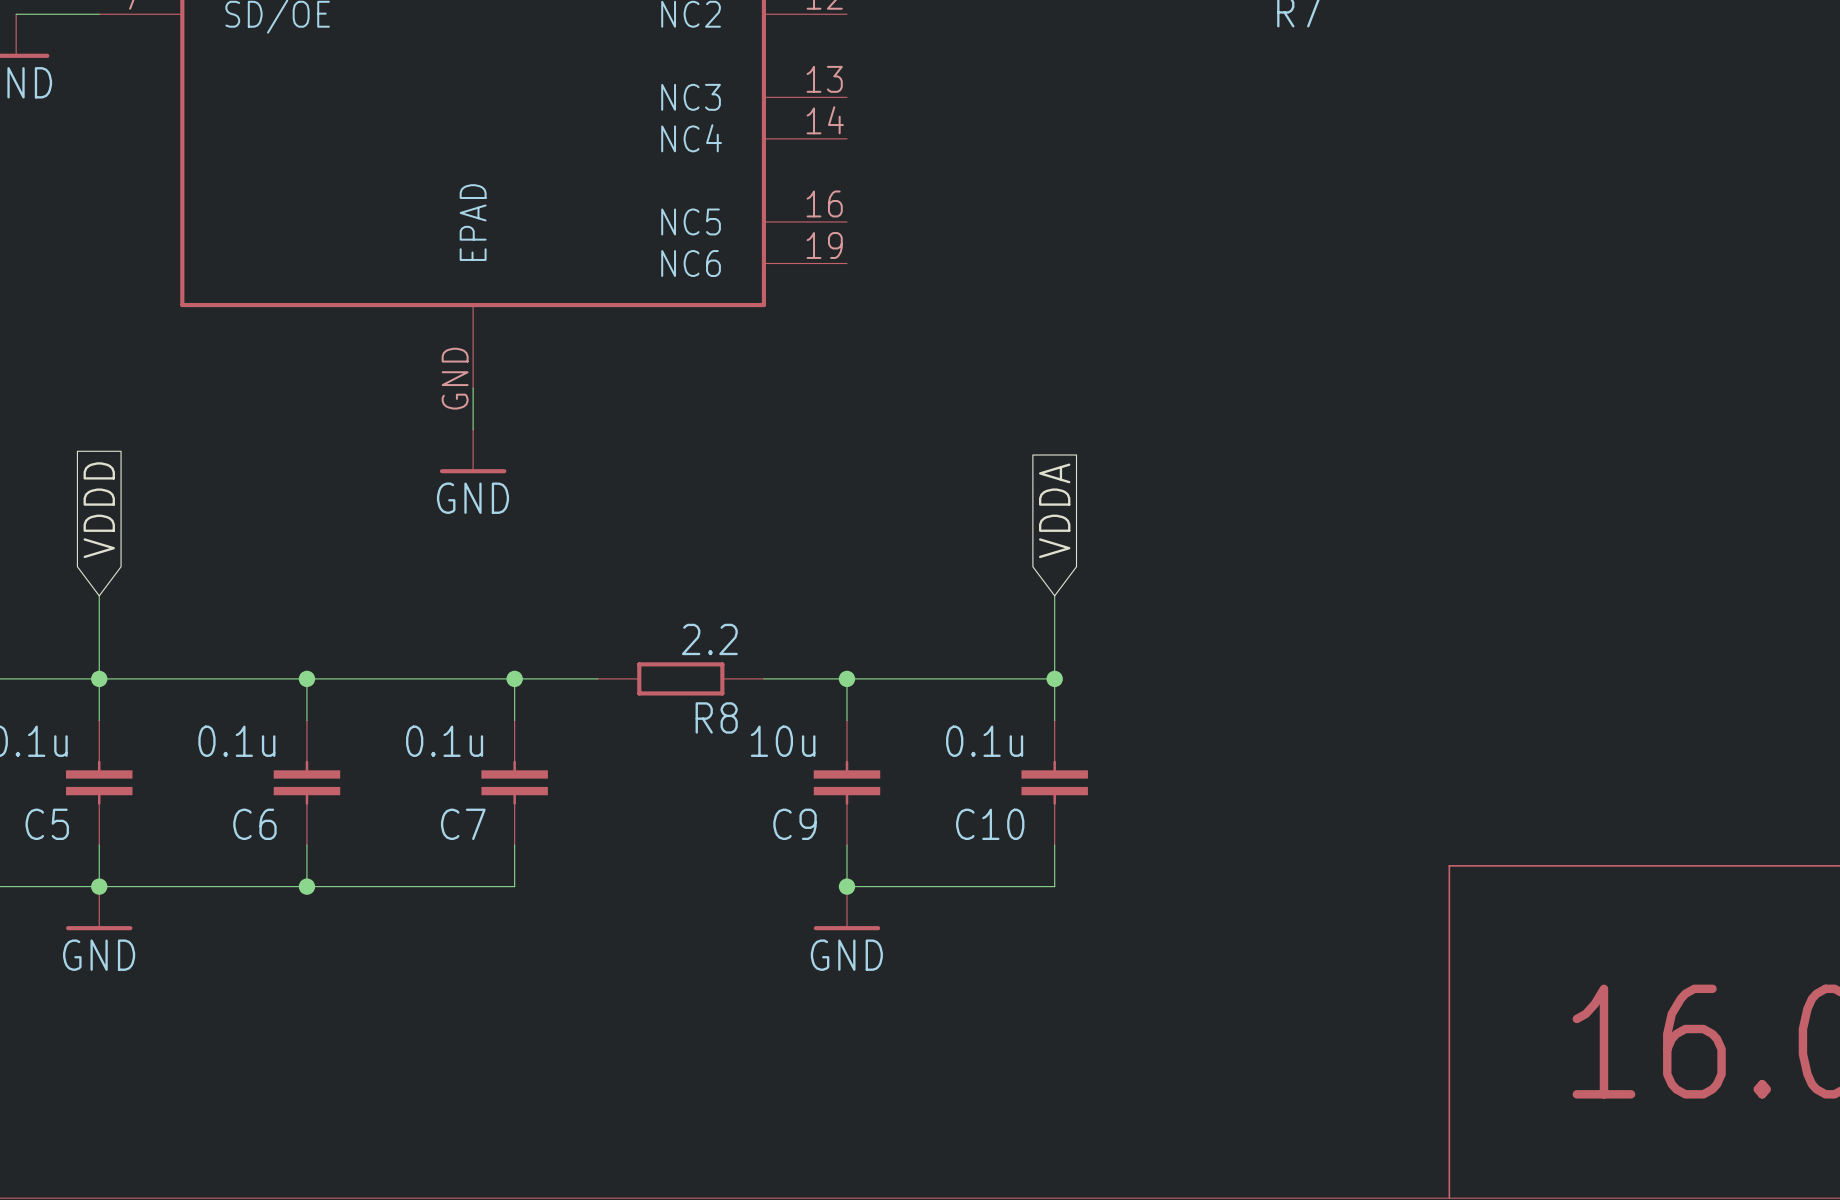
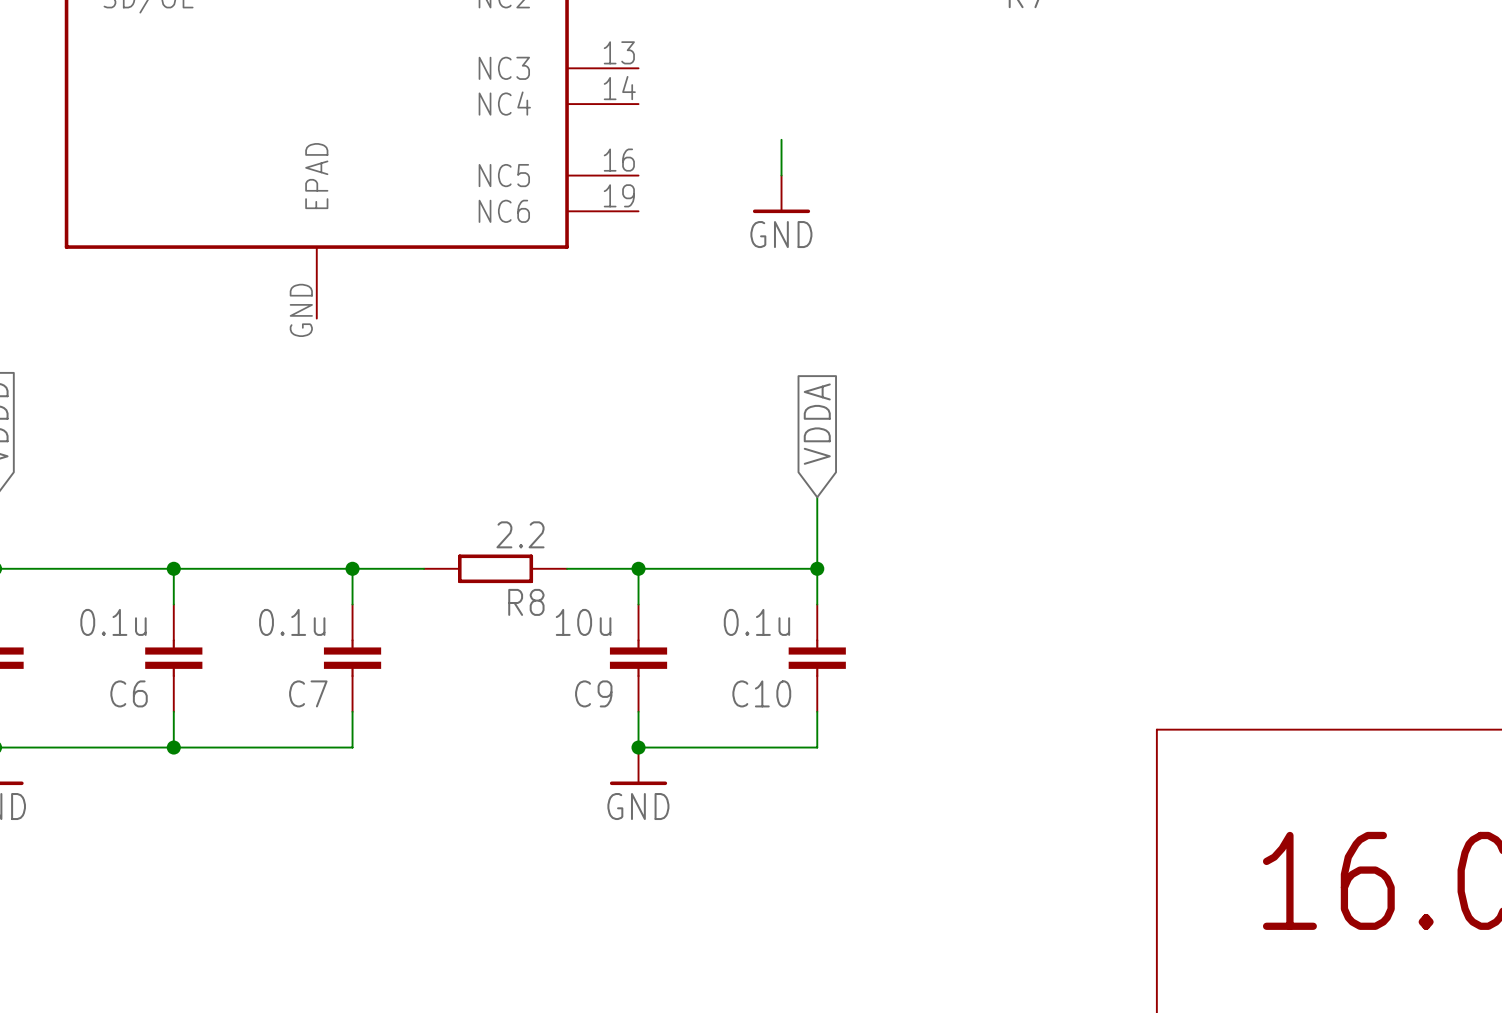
wire: none -> (781, 139) (781, 175)
power symbol: none -> GND (781, 194)
wire: (473, 388) (473, 429) -> none
power symbol: GND (473, 451) -> none

